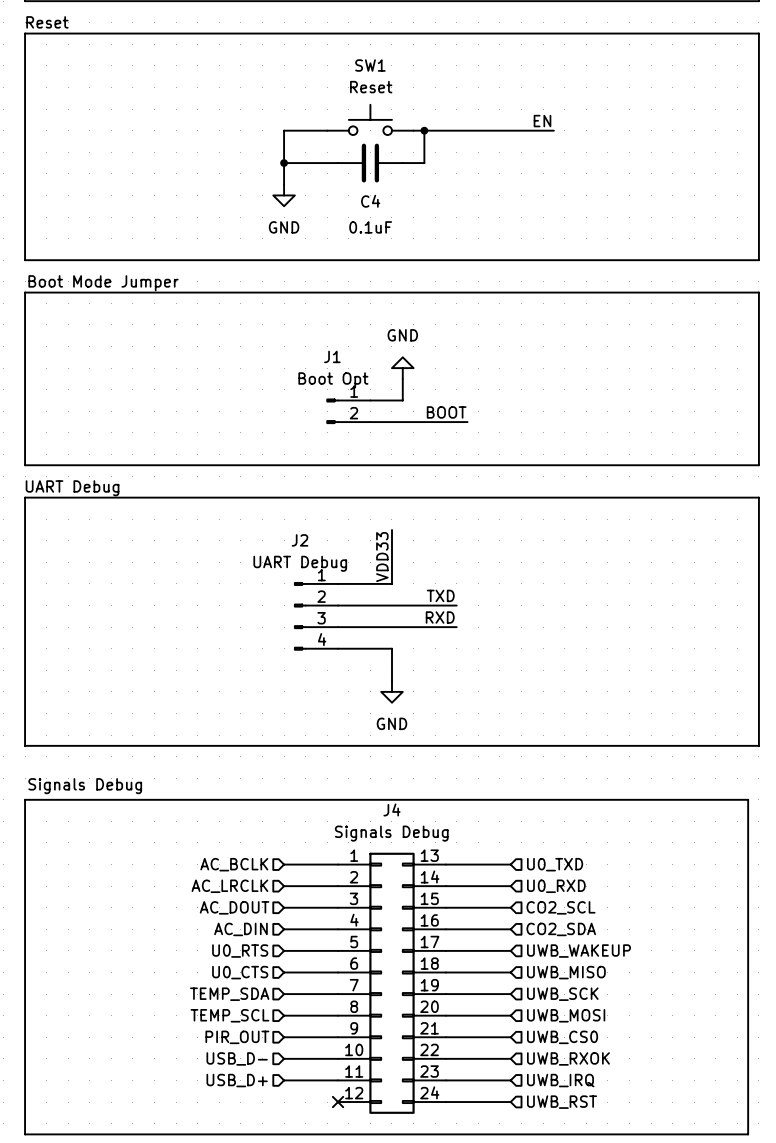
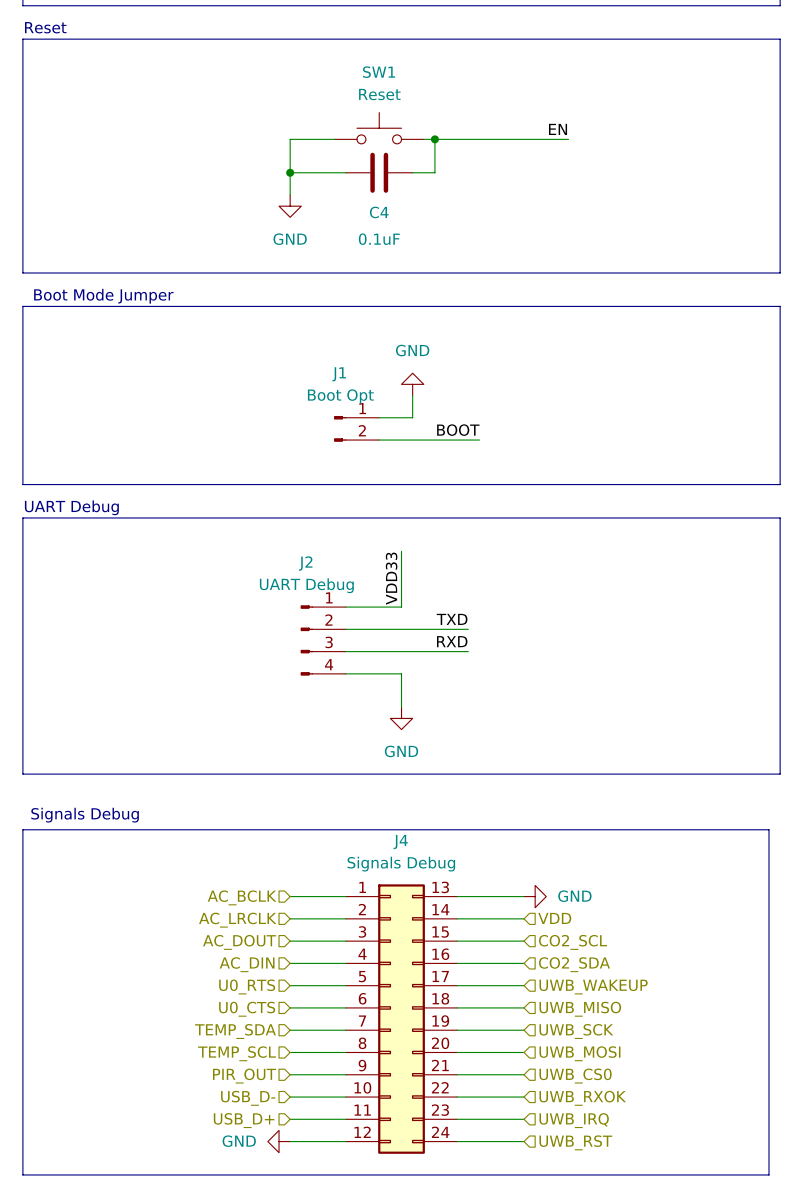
power symbol: none -> GND (535, 896)
hierarchical label: U0_TXD (555, 864) -> none
hierarchical label: U0_RXD (556, 886) -> VDD (554, 918)
power symbol: none -> GND (279, 1141)
wire: none -> (290, 1141) (345, 1141)
no-connect mark: (338, 1102) -> none

